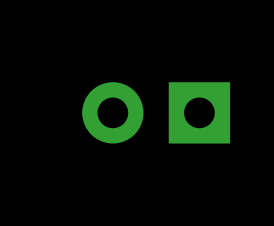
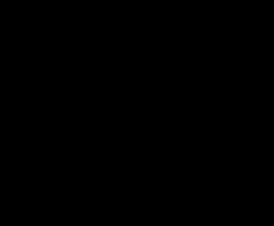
part: (156, 112) -> none

